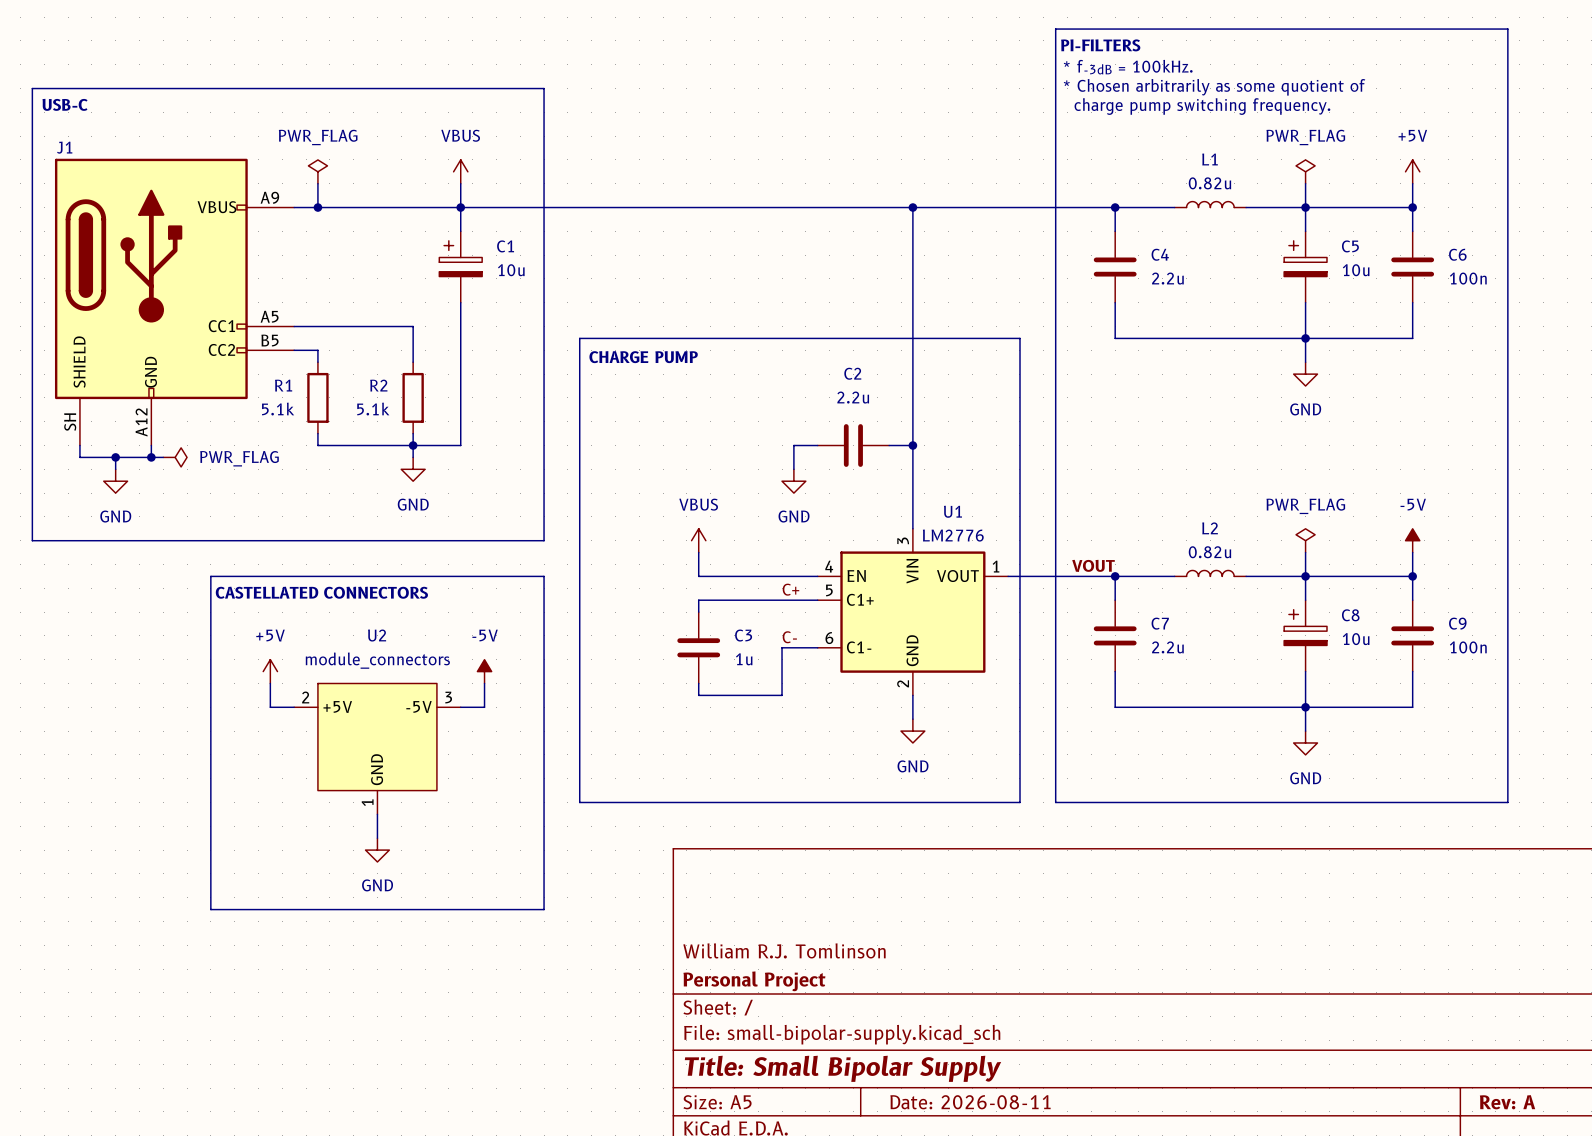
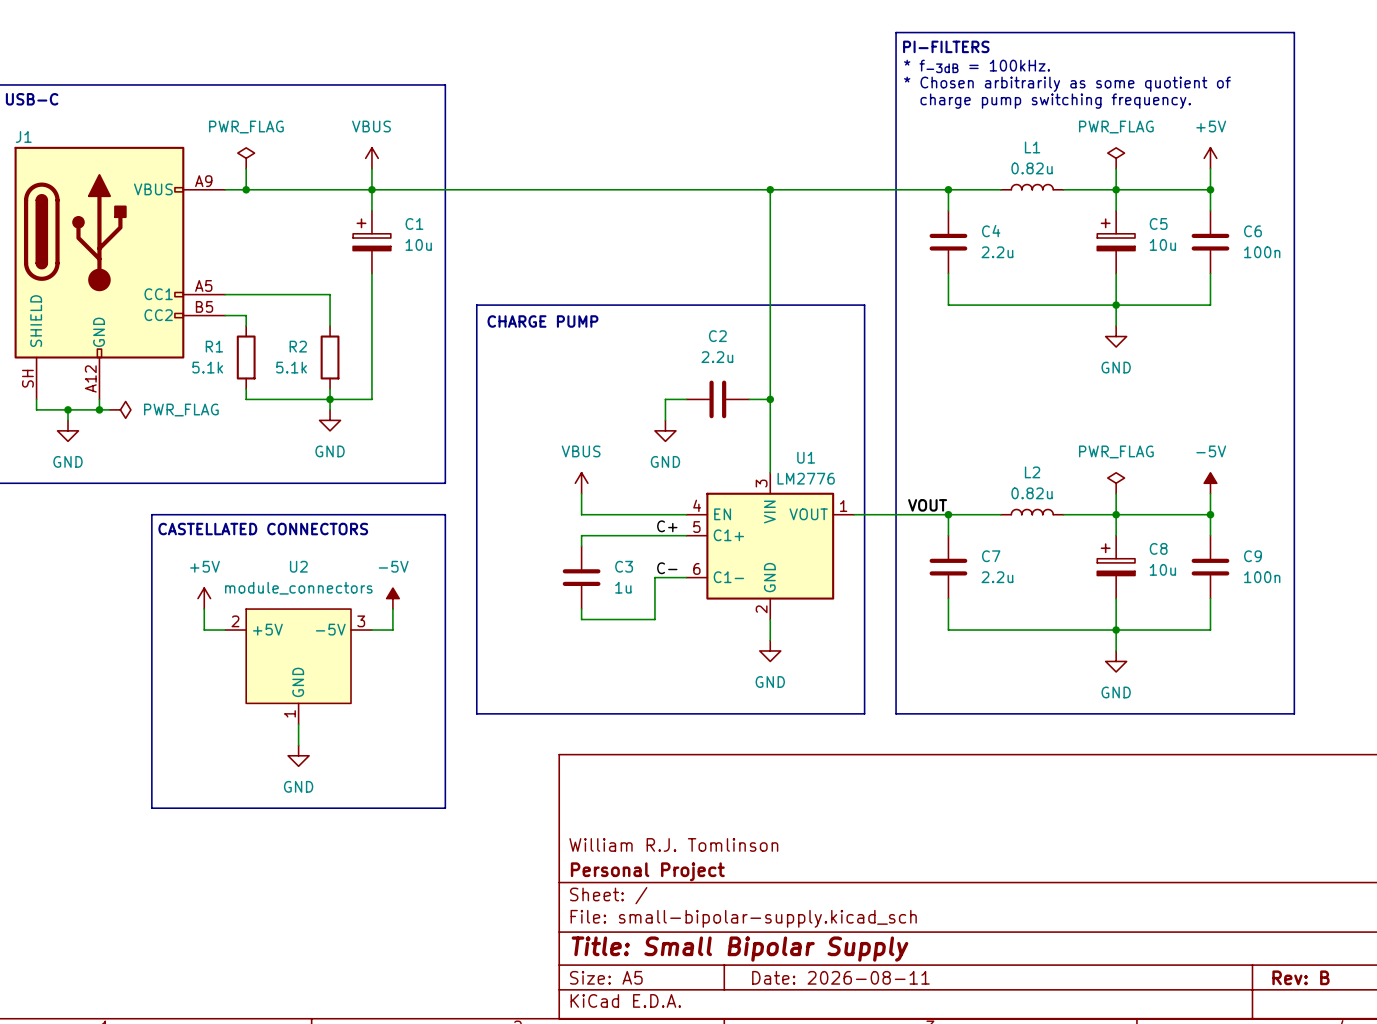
title block: Rev: A (1507, 1102) -> Rev: B (1300, 977)

